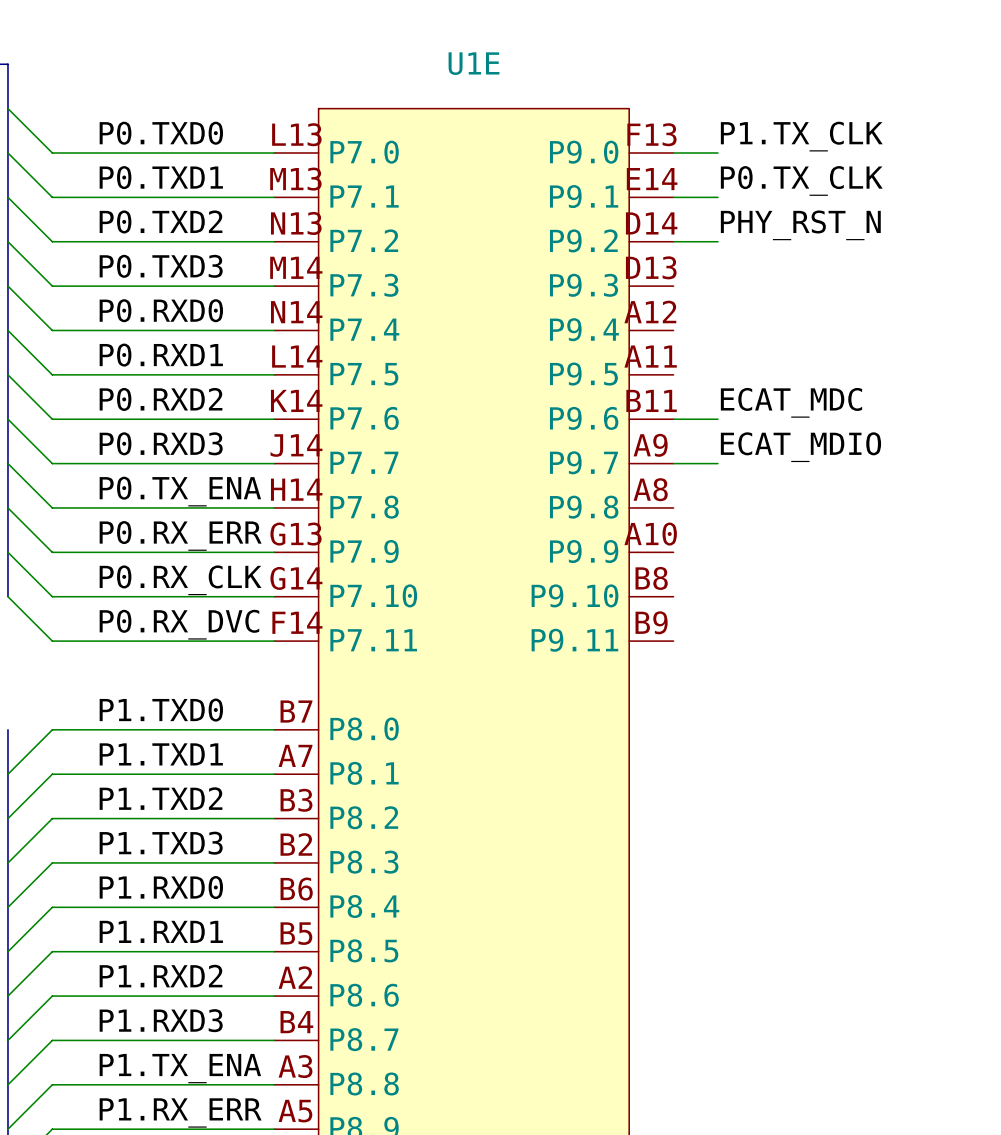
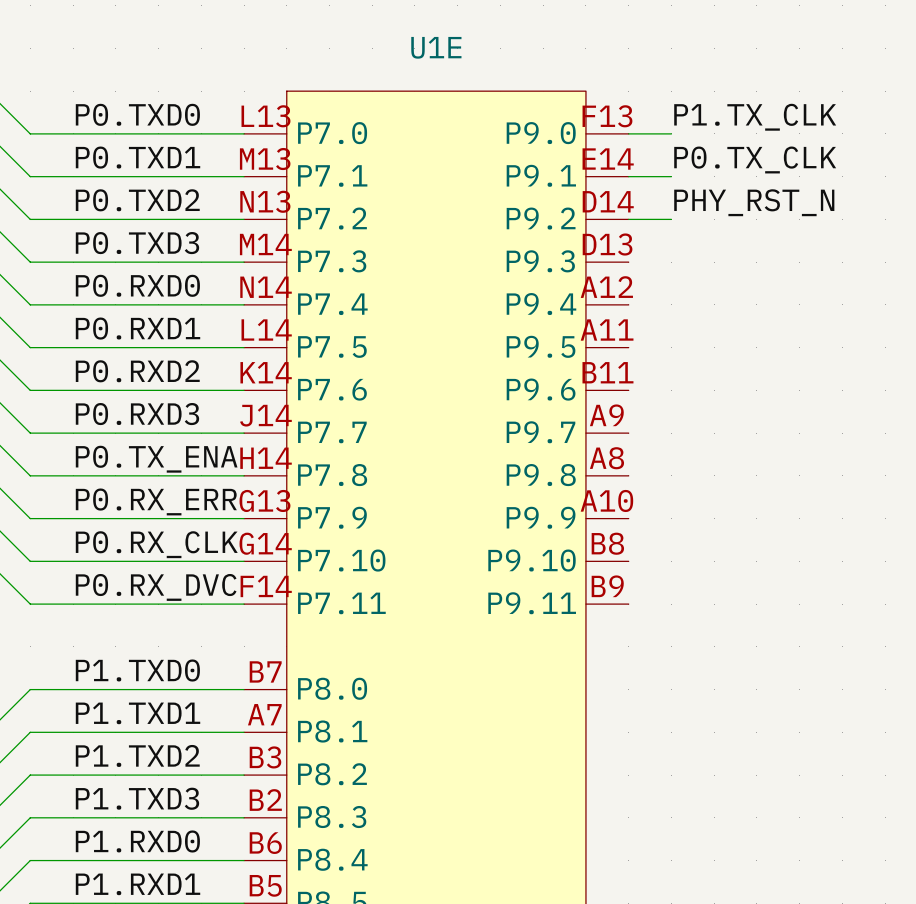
label: ECAT_MDC (791, 402) -> none
wire: (673, 419) (717, 419) -> none
label: ECAT_MDIO (800, 447) -> none
wire: (673, 463) (717, 463) -> none

